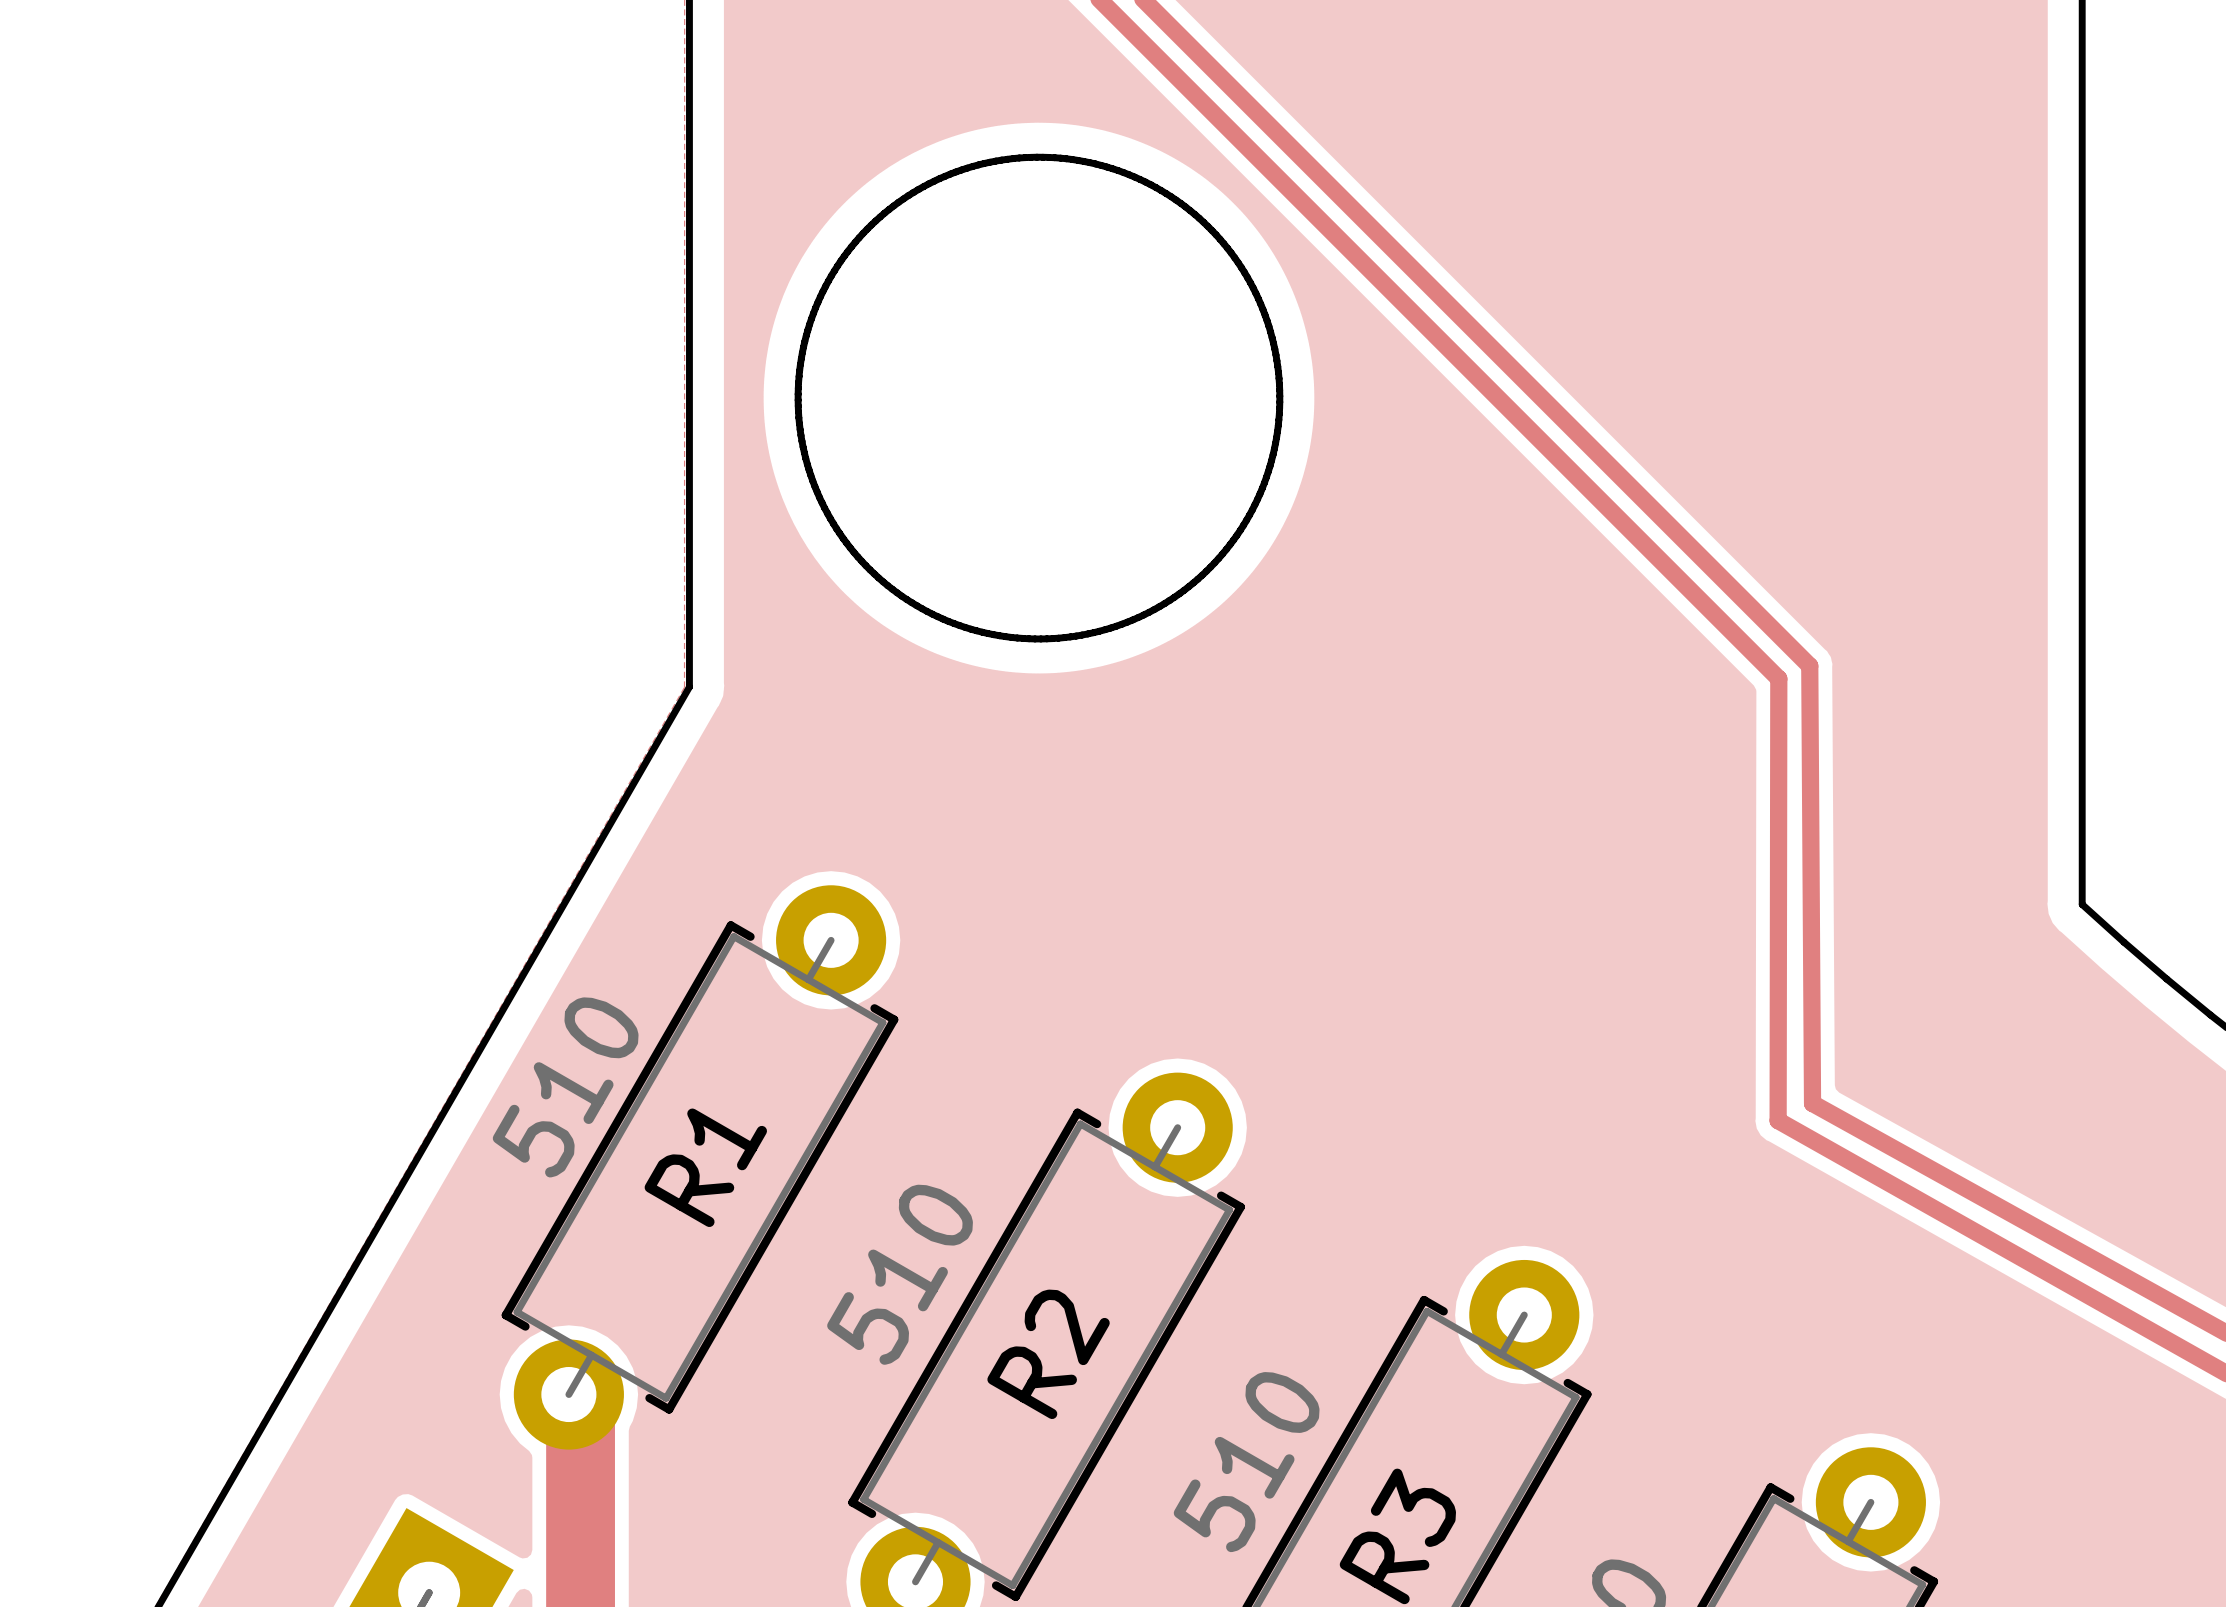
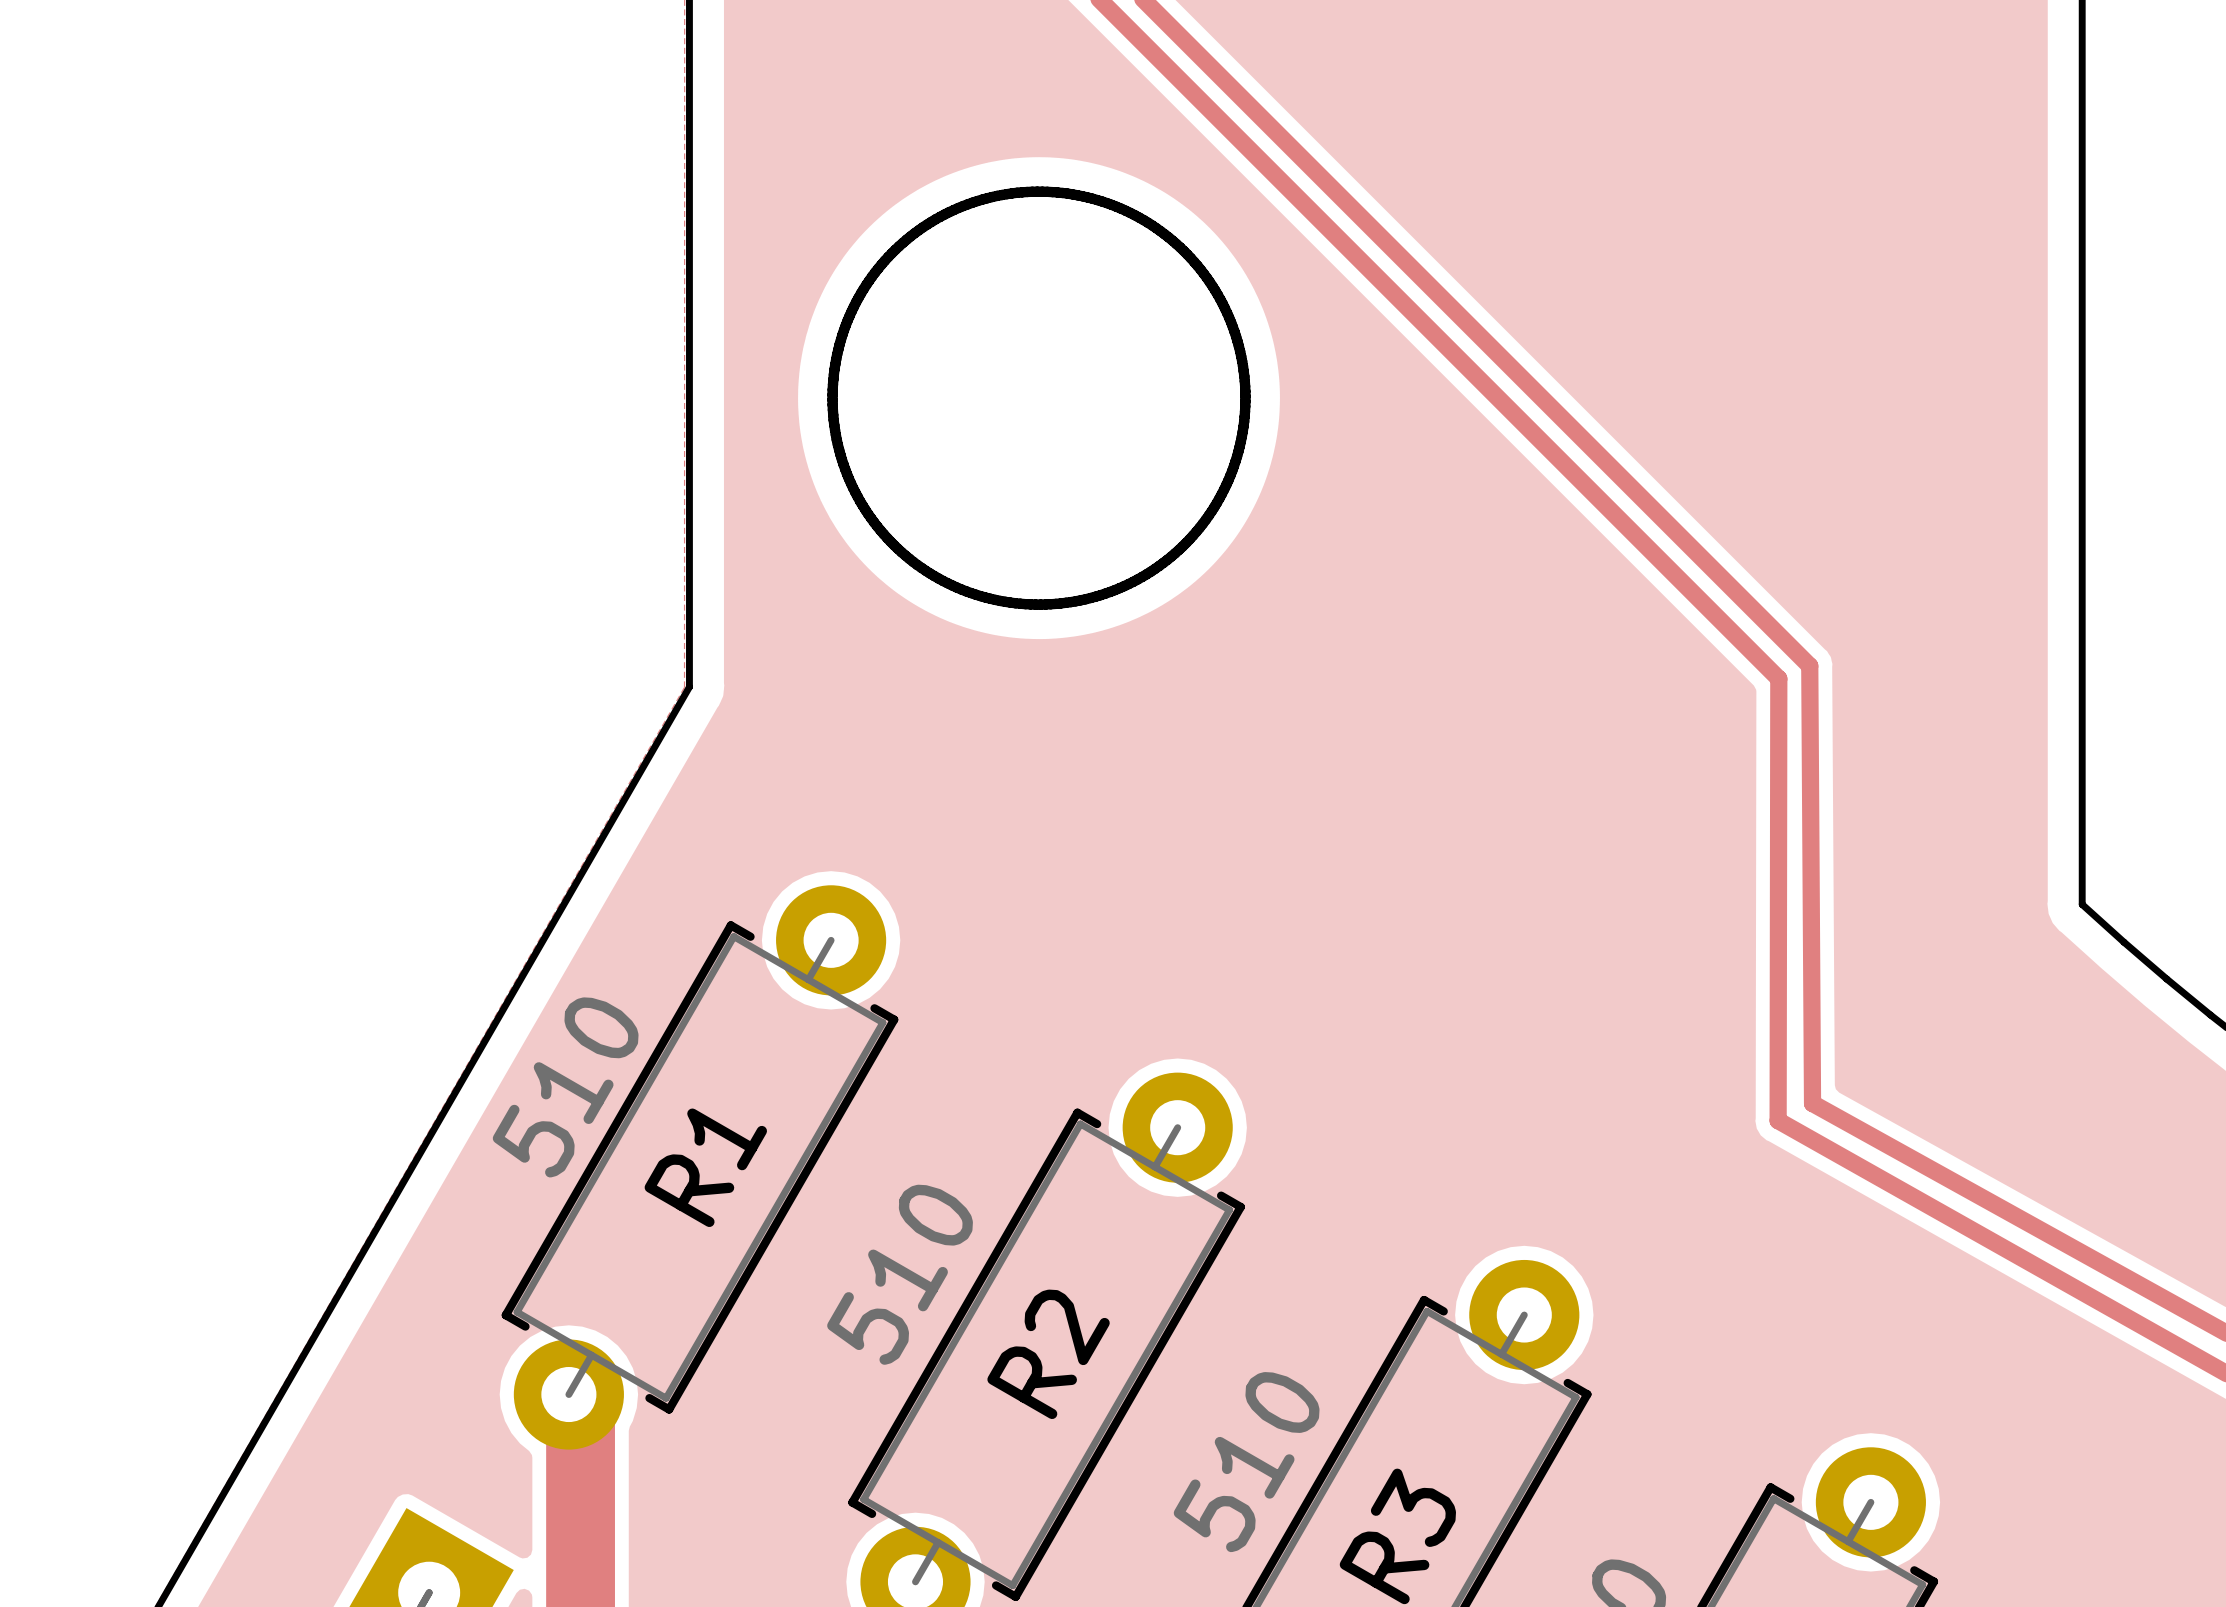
board edge: (1031, 157) (1078, 160) (1123, 172) (1166, 193) (1203, 222) (1234, 257) (1258, 298) (1273, 343) (1279, 390) (1276, 437) (1264, 482) (1243, 525) (1214, 562) (1179, 593) (1138, 617) (1093, 632) (1046, 638) (999, 635) (954, 623) (911, 602) (874, 573) (843, 538) (819, 497) (804, 452) (798, 405) (801, 358) (813, 313) (834, 270) (863, 233) (898, 202) (939, 178) (984, 163) (1031, 157) -> (1032, 191) (992, 197) (953, 210) (918, 230) (888, 256) (863, 289) (845, 325) (835, 364) (832, 404) (837, 444) (850, 483) (871, 518) (897, 548) (929, 573) (966, 591) (1005, 601) (1045, 604) (1085, 599) (1124, 586) (1159, 565) (1189, 539) (1214, 507) (1232, 470) (1242, 431) (1245, 391) (1240, 351) (1227, 312) (1206, 277) (1180, 247) (1148, 222) (1111, 204) (1072, 194) (1032, 191)

